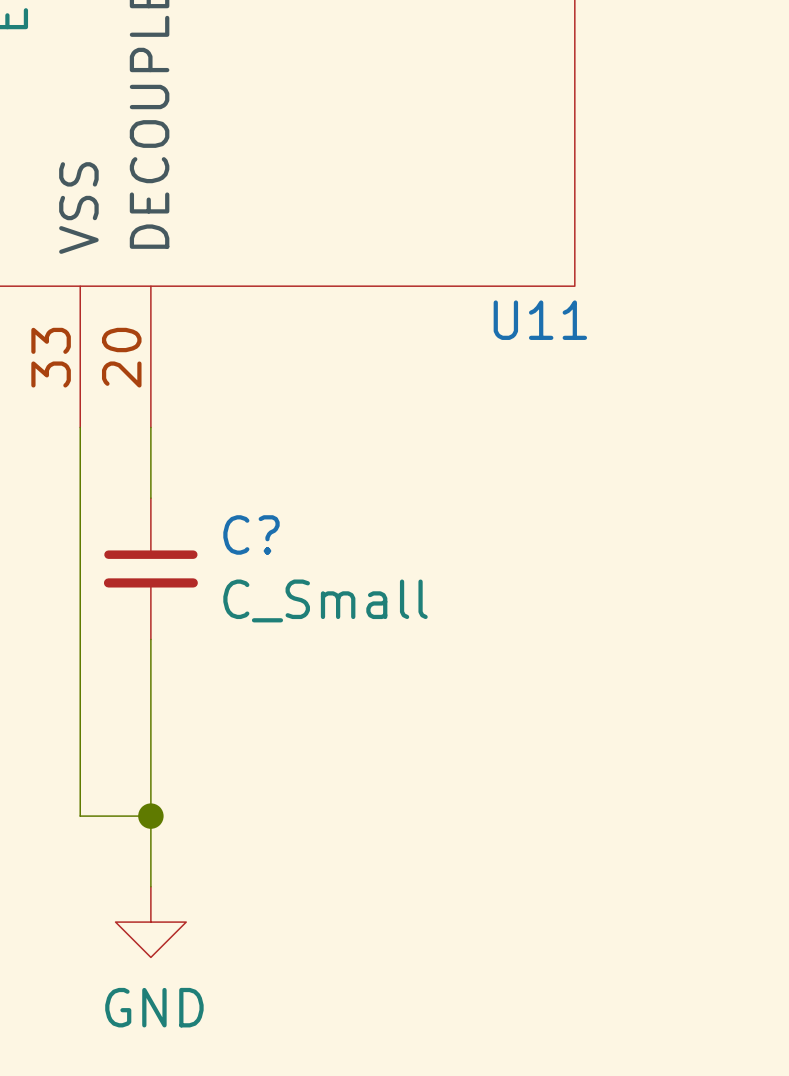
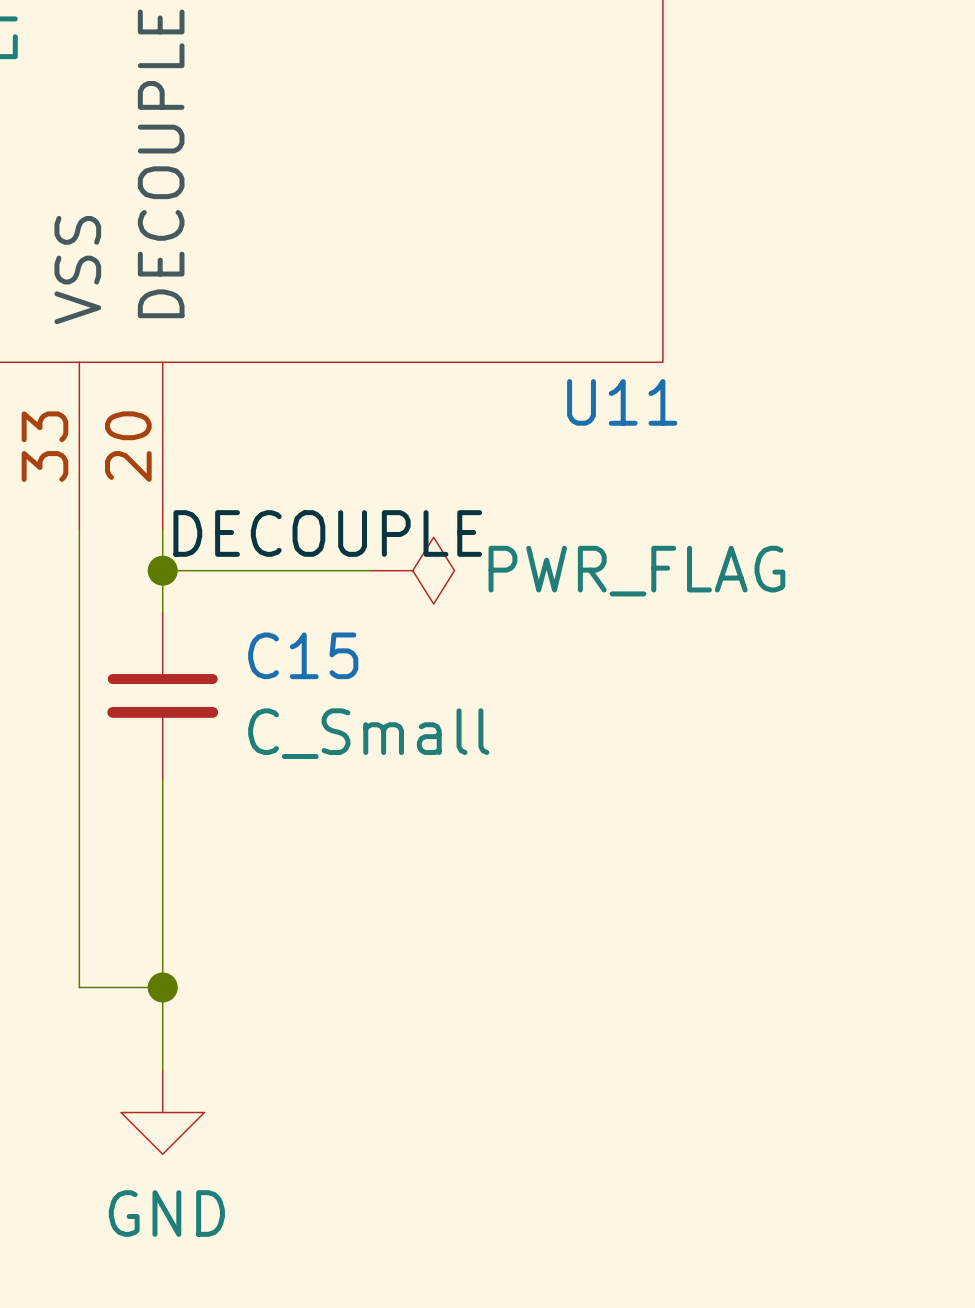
label: none -> DECOUPLE (327, 533)
wire: none -> (162, 570) (371, 570)
junction: none -> (162, 570)
power symbol: none -> PWR_FLAG (412, 570)
C? name: C? (251, 534) -> C15 (303, 655)

